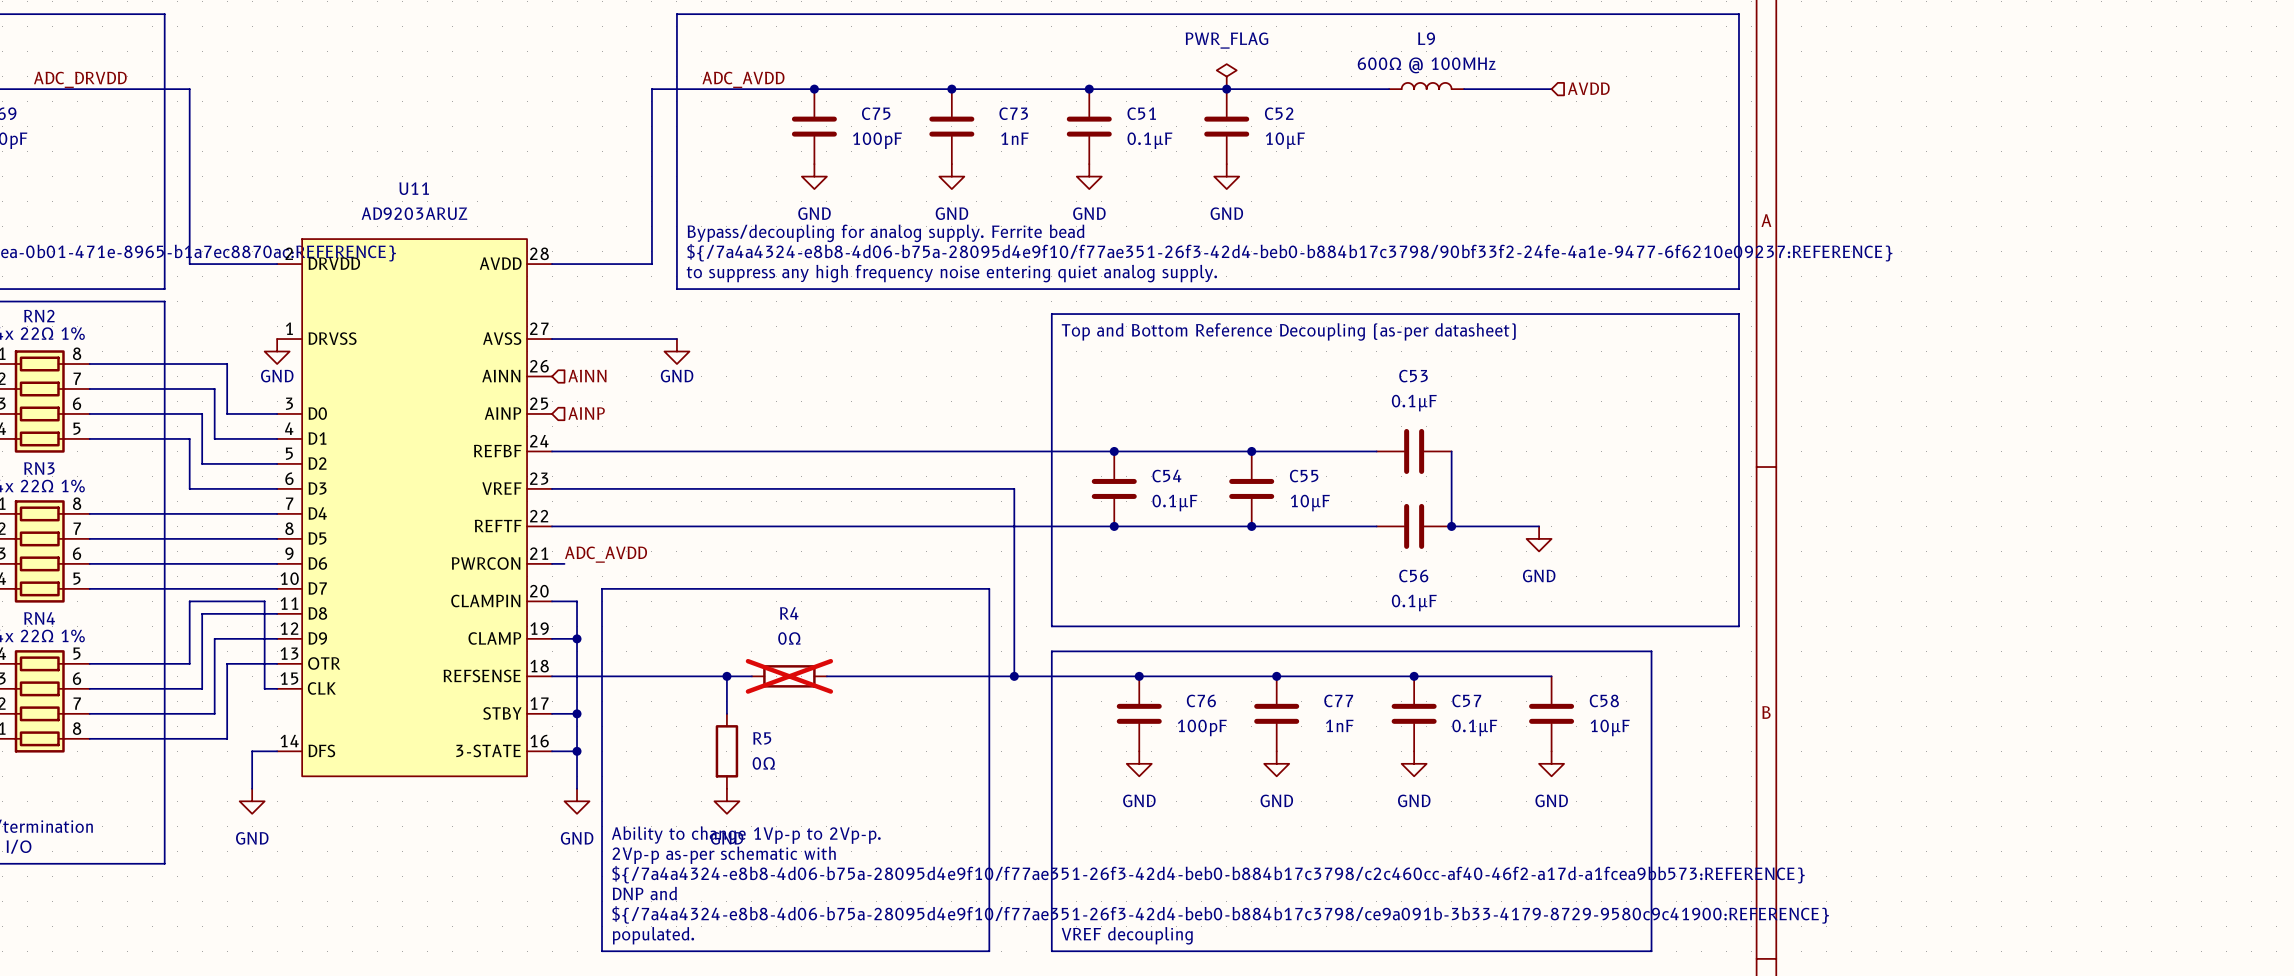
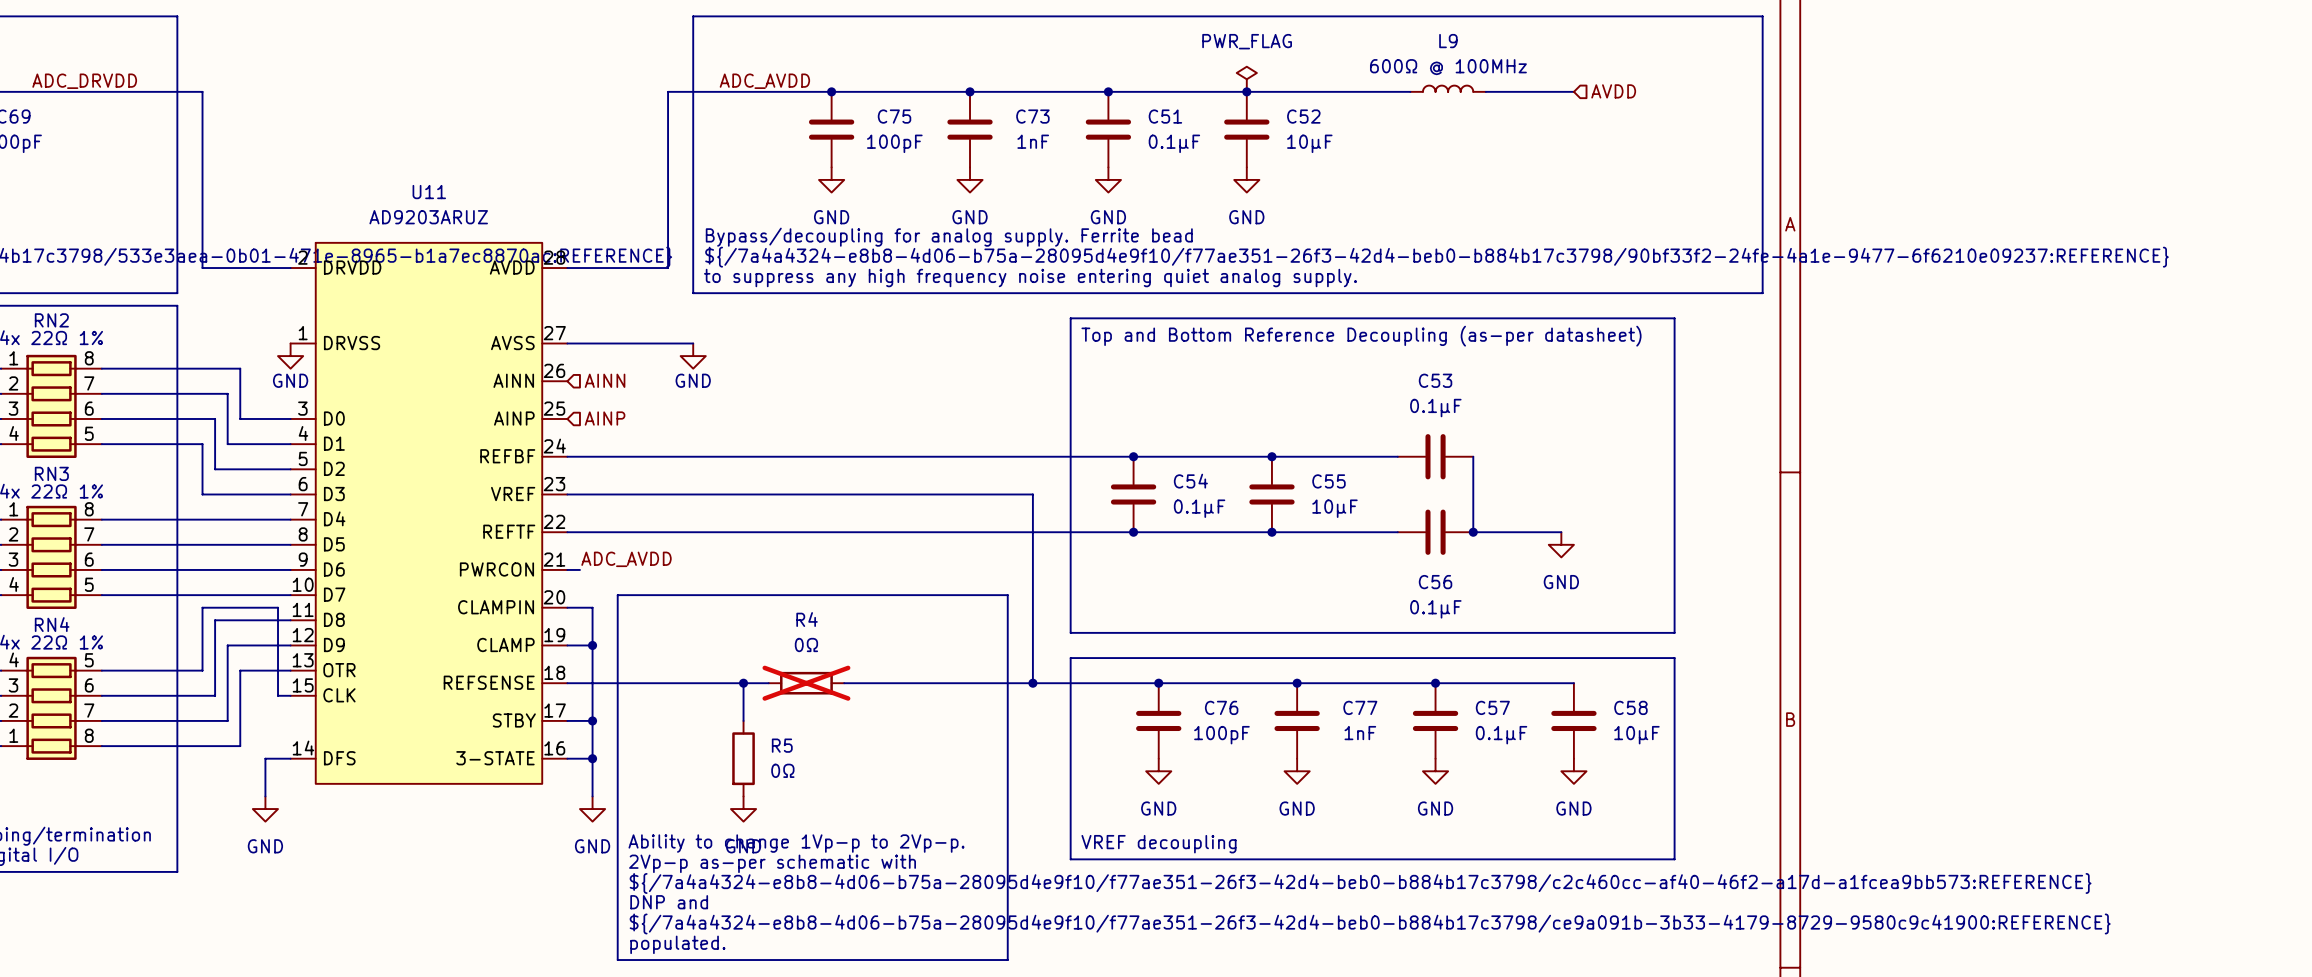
line: (1651, 314) (1738, 314) (1738, 626) (1651, 626) -> (1674, 318) (1674, 632)
line: (1051, 851) (1051, 951) (1651, 951) (1651, 851) -> (1070, 859) (1674, 859)
text position: VREF decoupling (1127, 935) -> VREF decoupling (1158, 844)

